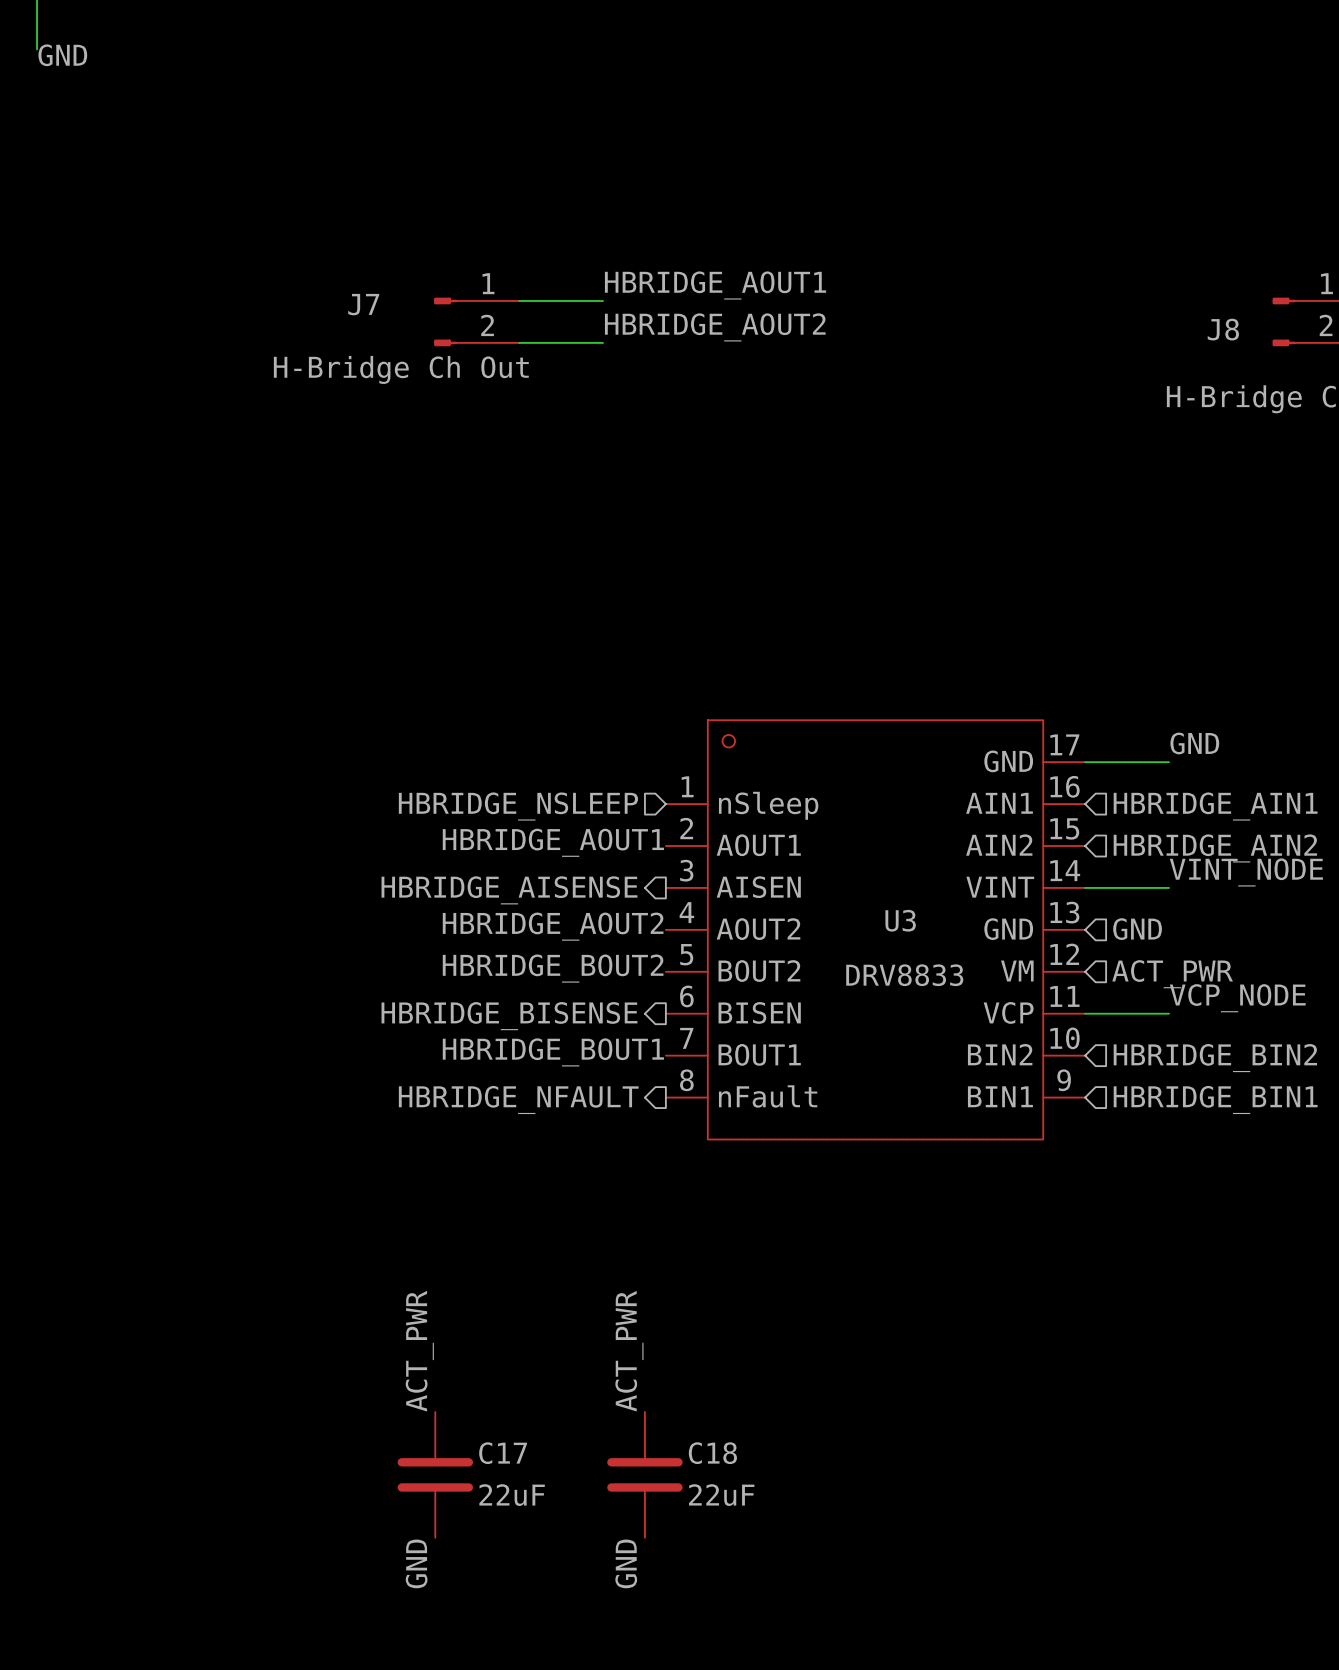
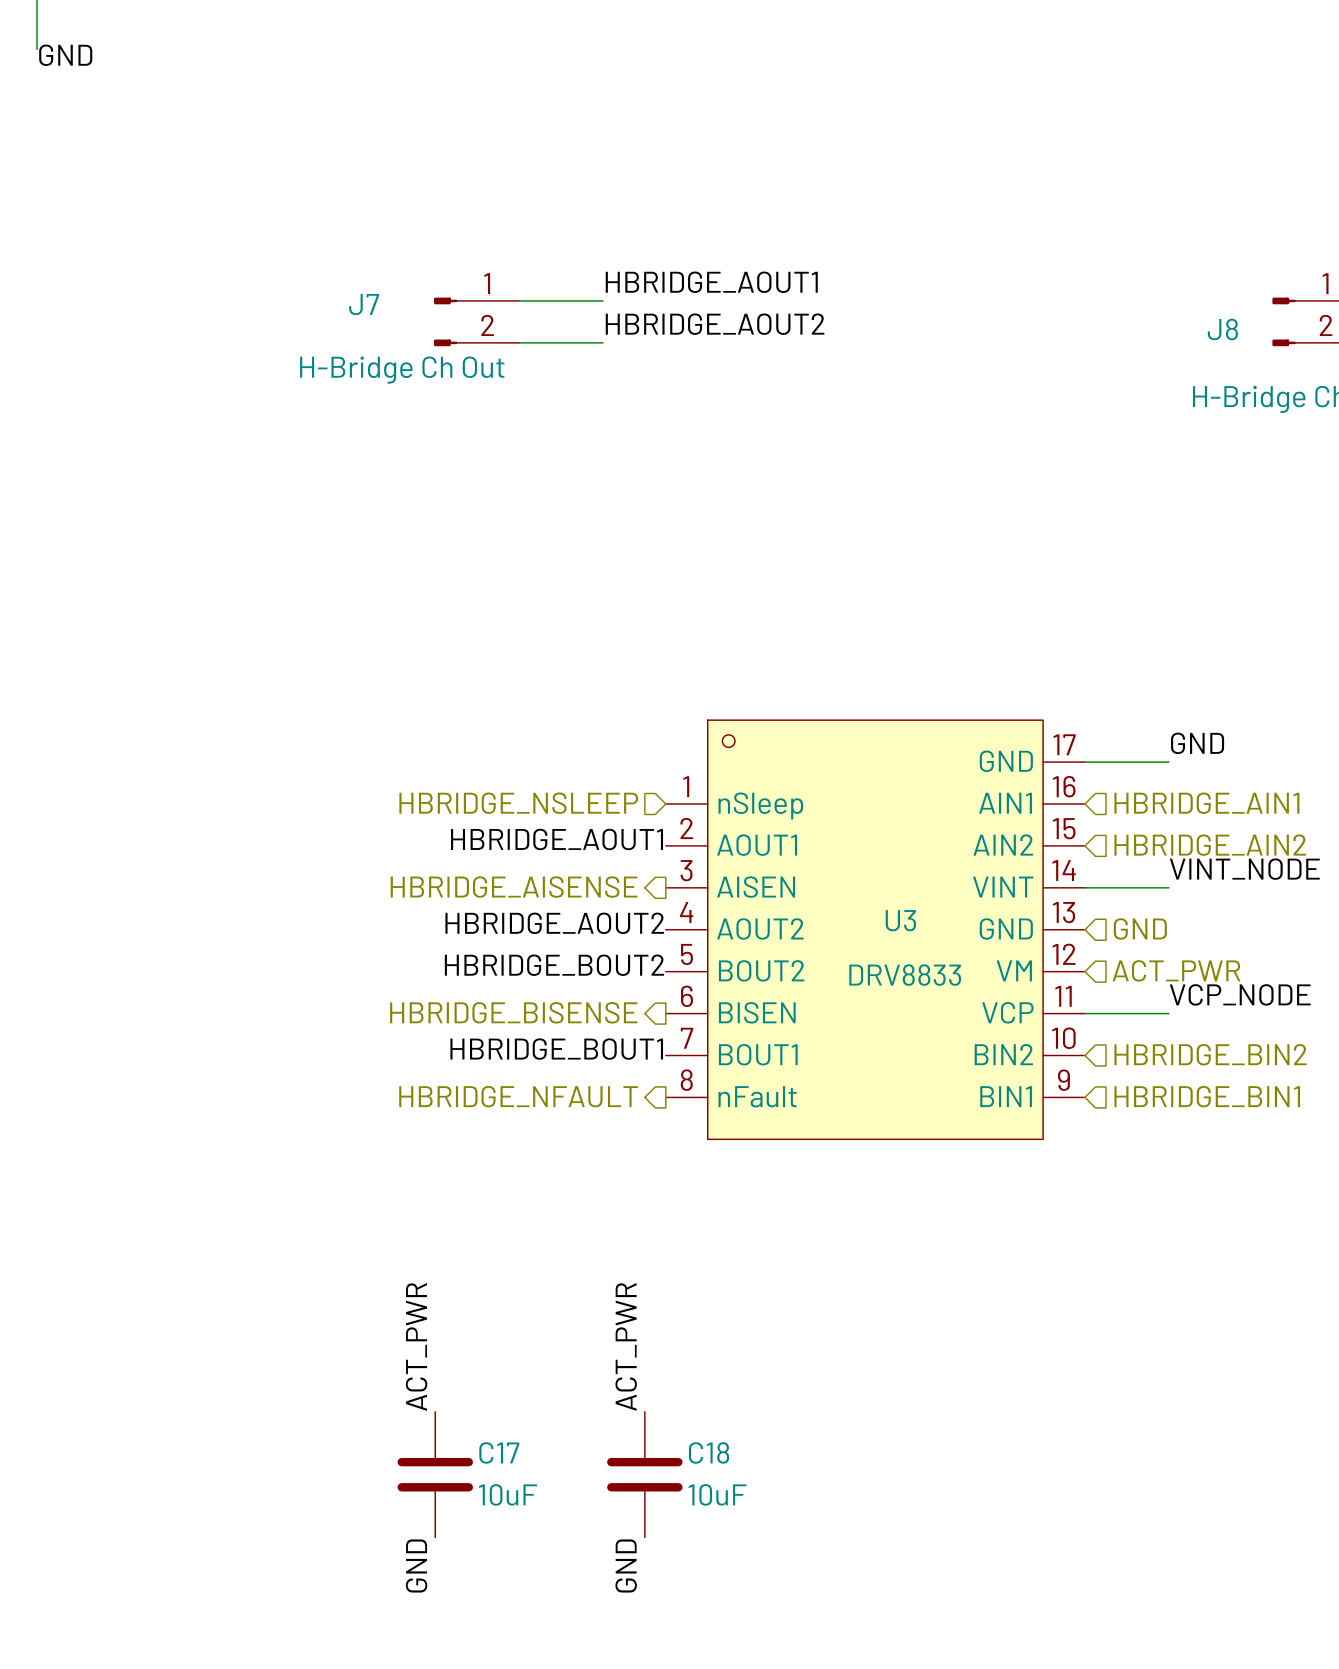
C17 value: 22uF (512, 1495) -> 10uF (507, 1494)
C18 value: 22uF (721, 1495) -> 10uF (717, 1494)

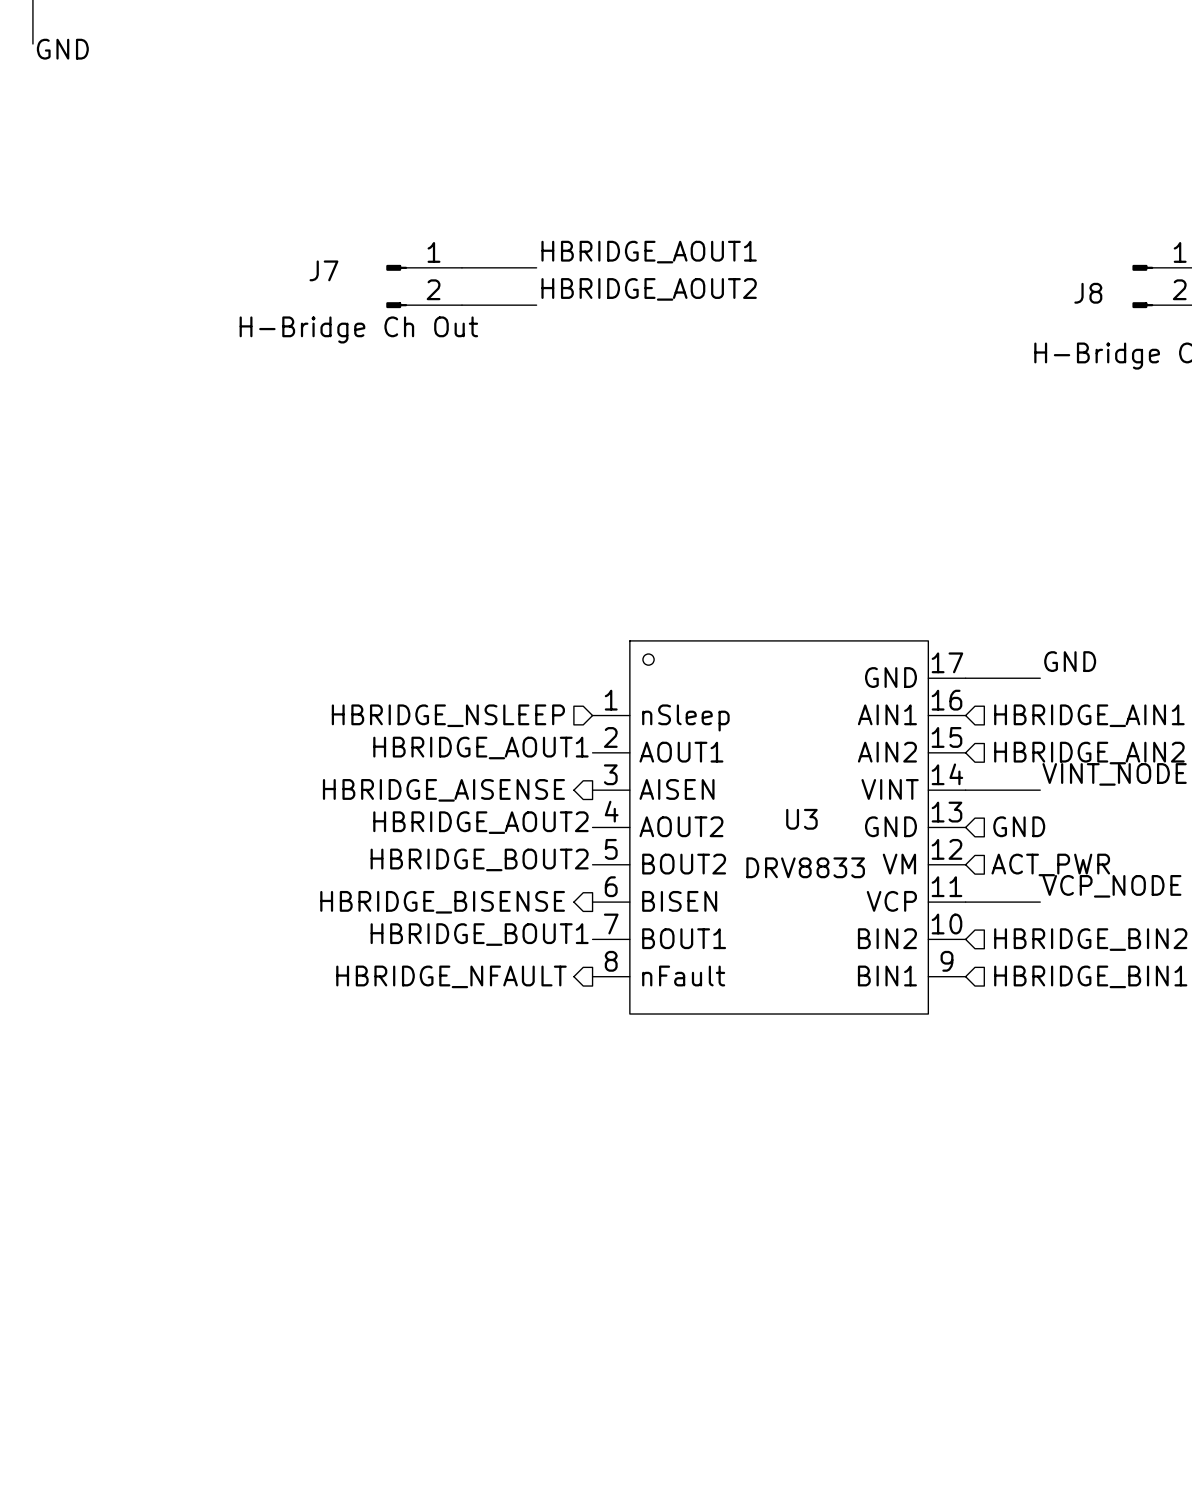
label: ACT_PWR (416, 1346) -> none
label: ACT_PWR (626, 1346) -> none
C17: 10uF (435, 1474) -> none
C18: 10uF (644, 1474) -> none
label: GND (416, 1565) -> none
label: GND (626, 1565) -> none

